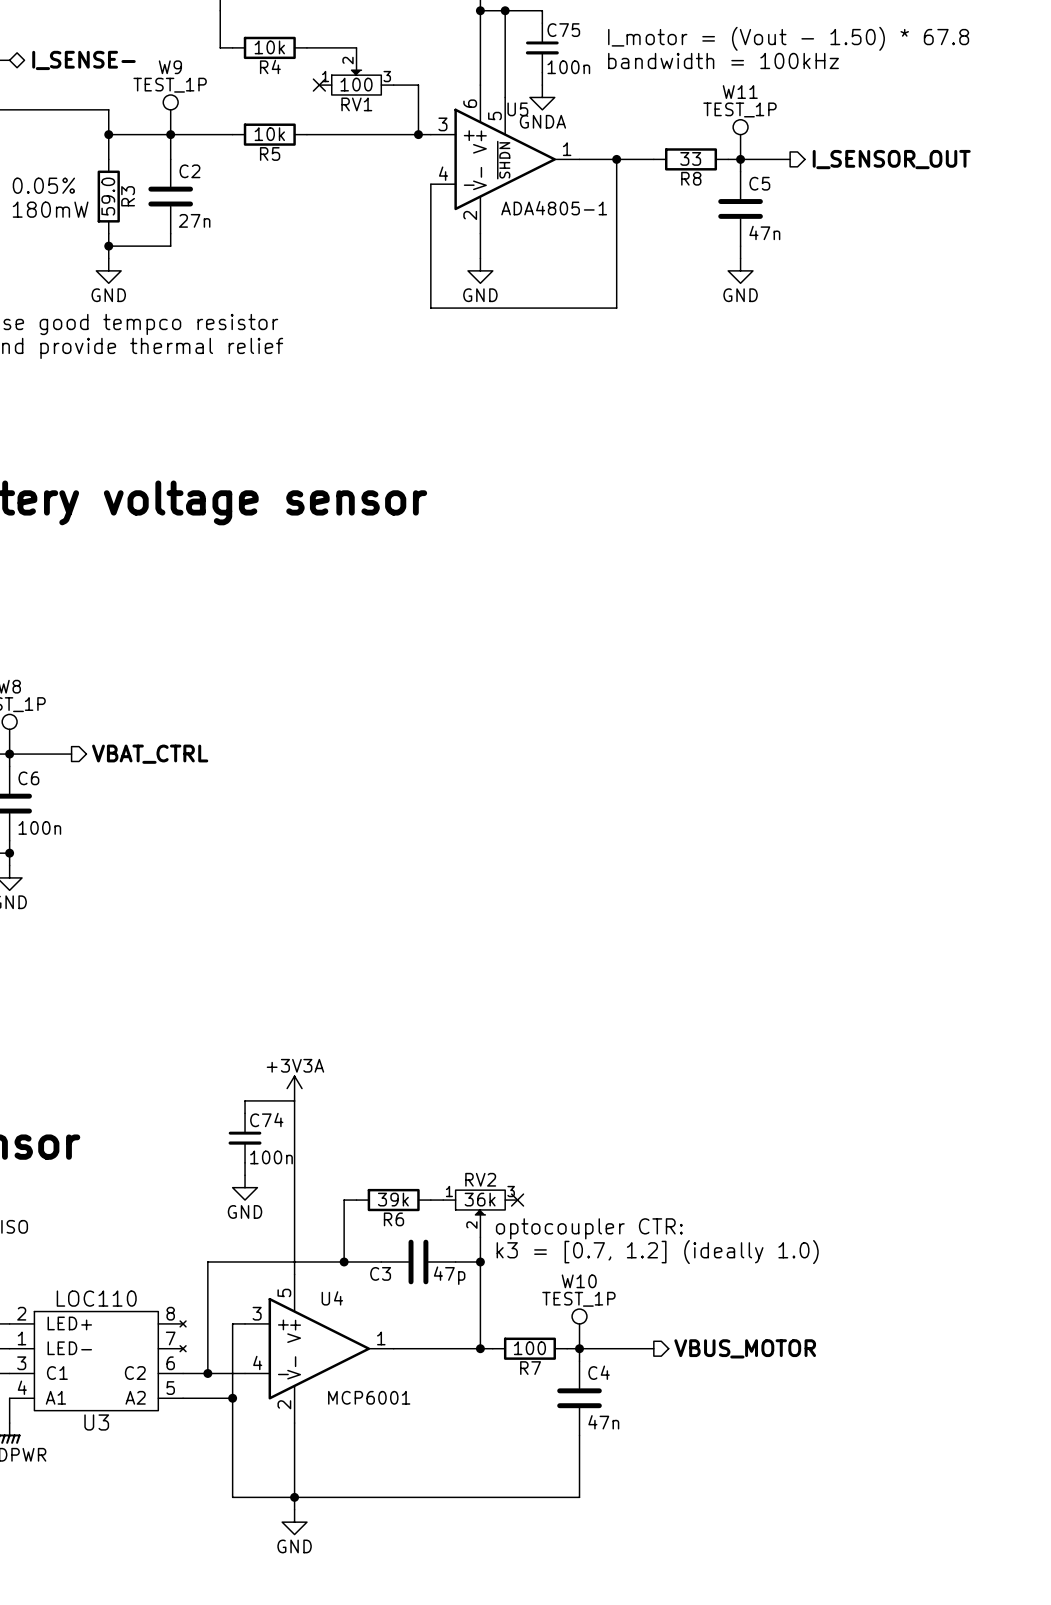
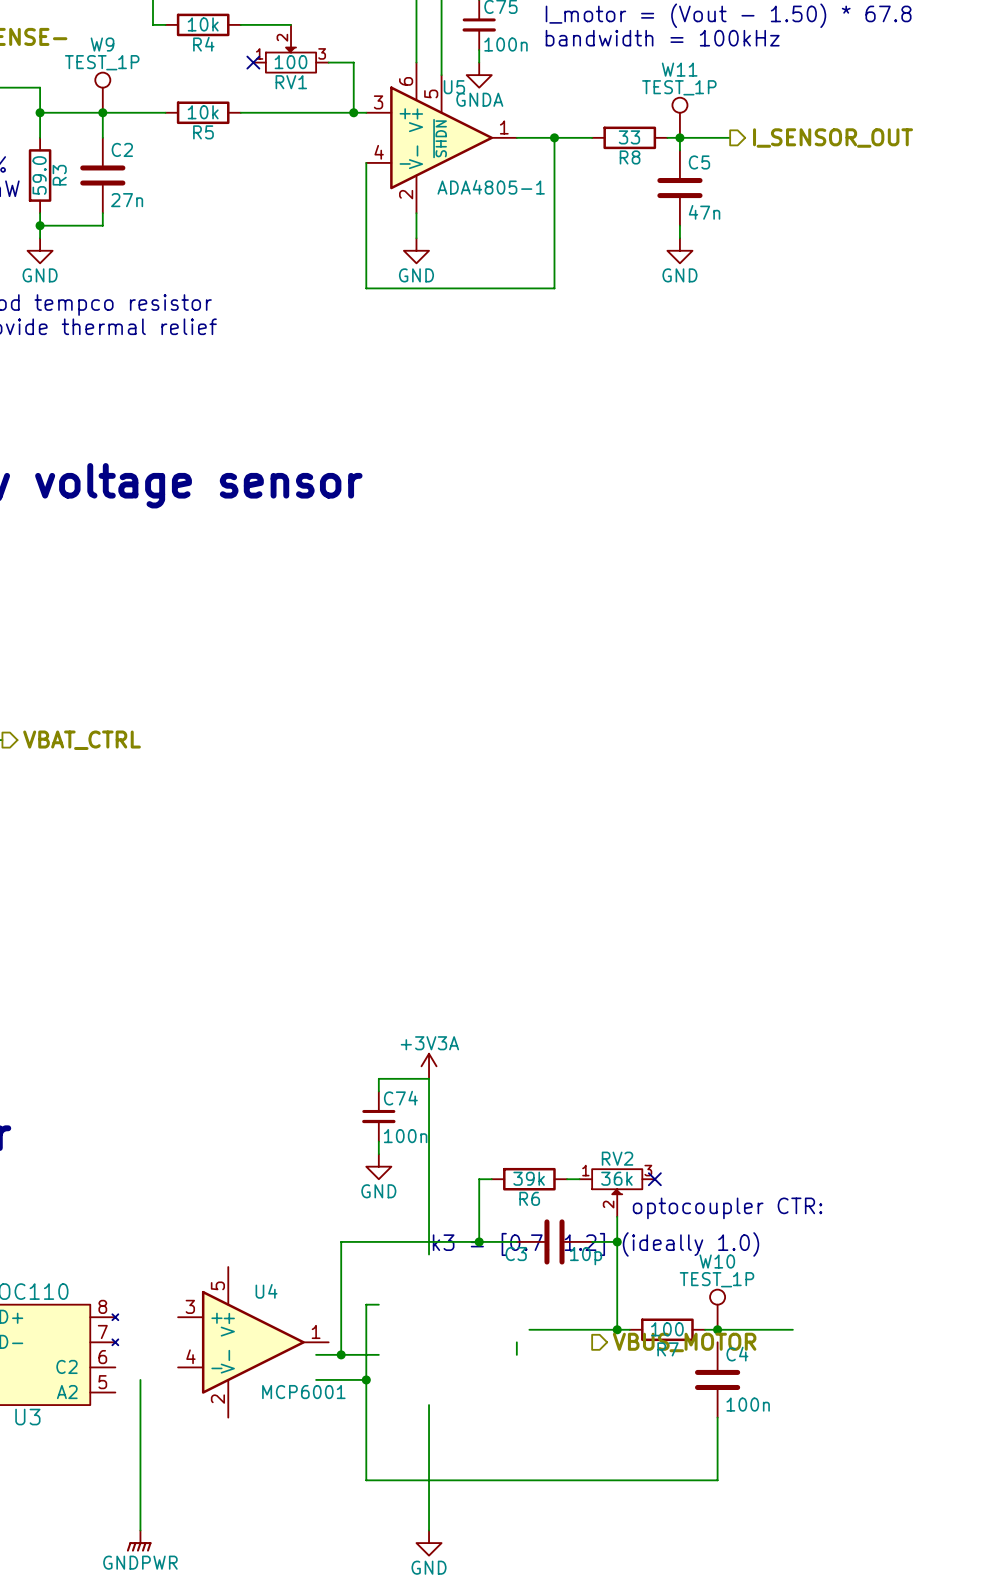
power symbol position: +3V3A (294, 1088) -> +3V3A (429, 1066)
wire: (245, 1113) (245, 1100) (294, 1100) (294, 1274) -> (378, 1091) (378, 1078) (429, 1078) (429, 1254)
C74 position: (245, 1138) -> (378, 1116)
wire: (245, 1162) (245, 1175) -> (378, 1141) (378, 1154)
power symbol: none -> GND (378, 1166)
power symbol: GND (245, 1187) -> none
no-connect mark: none -> (654, 1179)
wire: (356, 1200) (344, 1200) (344, 1261) -> (491, 1179) (479, 1179) (479, 1241)
R6 position: (393, 1200) -> (529, 1179)
wire: (430, 1200) (443, 1200) -> (567, 1179) (579, 1179)
no-connect mark: (517, 1200) -> none
RV2 position: (480, 1213) -> (617, 1193)
text position: optocoupler CTR: (589, 1228) -> optocoupler CTR: (727, 1208)
wire: (480, 1237) (480, 1348) -> (617, 1216) (617, 1329)
junction: none -> (479, 1241)
junction: none -> (617, 1241)
junction: (344, 1261) -> none
wire: (381, 1261) (207, 1261) (207, 1373) -> (516, 1241) (341, 1241) (341, 1354)
C3 position: (418, 1261) -> (554, 1241)
wire: (455, 1261) (480, 1261) -> (592, 1241) (617, 1241)
junction: (480, 1261) -> none
C3 value: 47p (449, 1275) -> 10p (586, 1256)
wire: (245, 1323) (232, 1323) (232, 1497) (579, 1497) (579, 1435) -> (378, 1304) (366, 1304) (366, 1480) (717, 1480) (717, 1417)
W10 position: (579, 1328) -> (717, 1309)
junction: none -> (617, 1329)
junction: none -> (717, 1329)
wire: (393, 1348) (492, 1348) -> (529, 1329) (629, 1329)
junction: (480, 1348) -> none
R7 position: (529, 1348) -> (667, 1329)
wire: (567, 1348) (653, 1348) -> (705, 1329) (792, 1329)
junction: (579, 1348) -> none
junction: none -> (341, 1354)
wire: (183, 1373) (245, 1373) -> (316, 1354) (378, 1354)
junction: (207, 1373) -> none
wire: none -> (140, 1379) (140, 1530)
junction: none -> (366, 1379)
wire: (183, 1398) (232, 1398) -> (316, 1379) (366, 1379)
junction: (232, 1398) -> none
C4 position: (579, 1398) -> (717, 1379)
wire: none -> (429, 1405) (429, 1530)
C4 value: 47n (603, 1422) -> 100n (748, 1404)
wire: (294, 1423) (294, 1509) -> none
junction: (294, 1497) -> none
power symbol: GND (294, 1522) -> none
power symbol: none -> GNDPWR (139, 1541)
power symbol: none -> GND (429, 1543)

